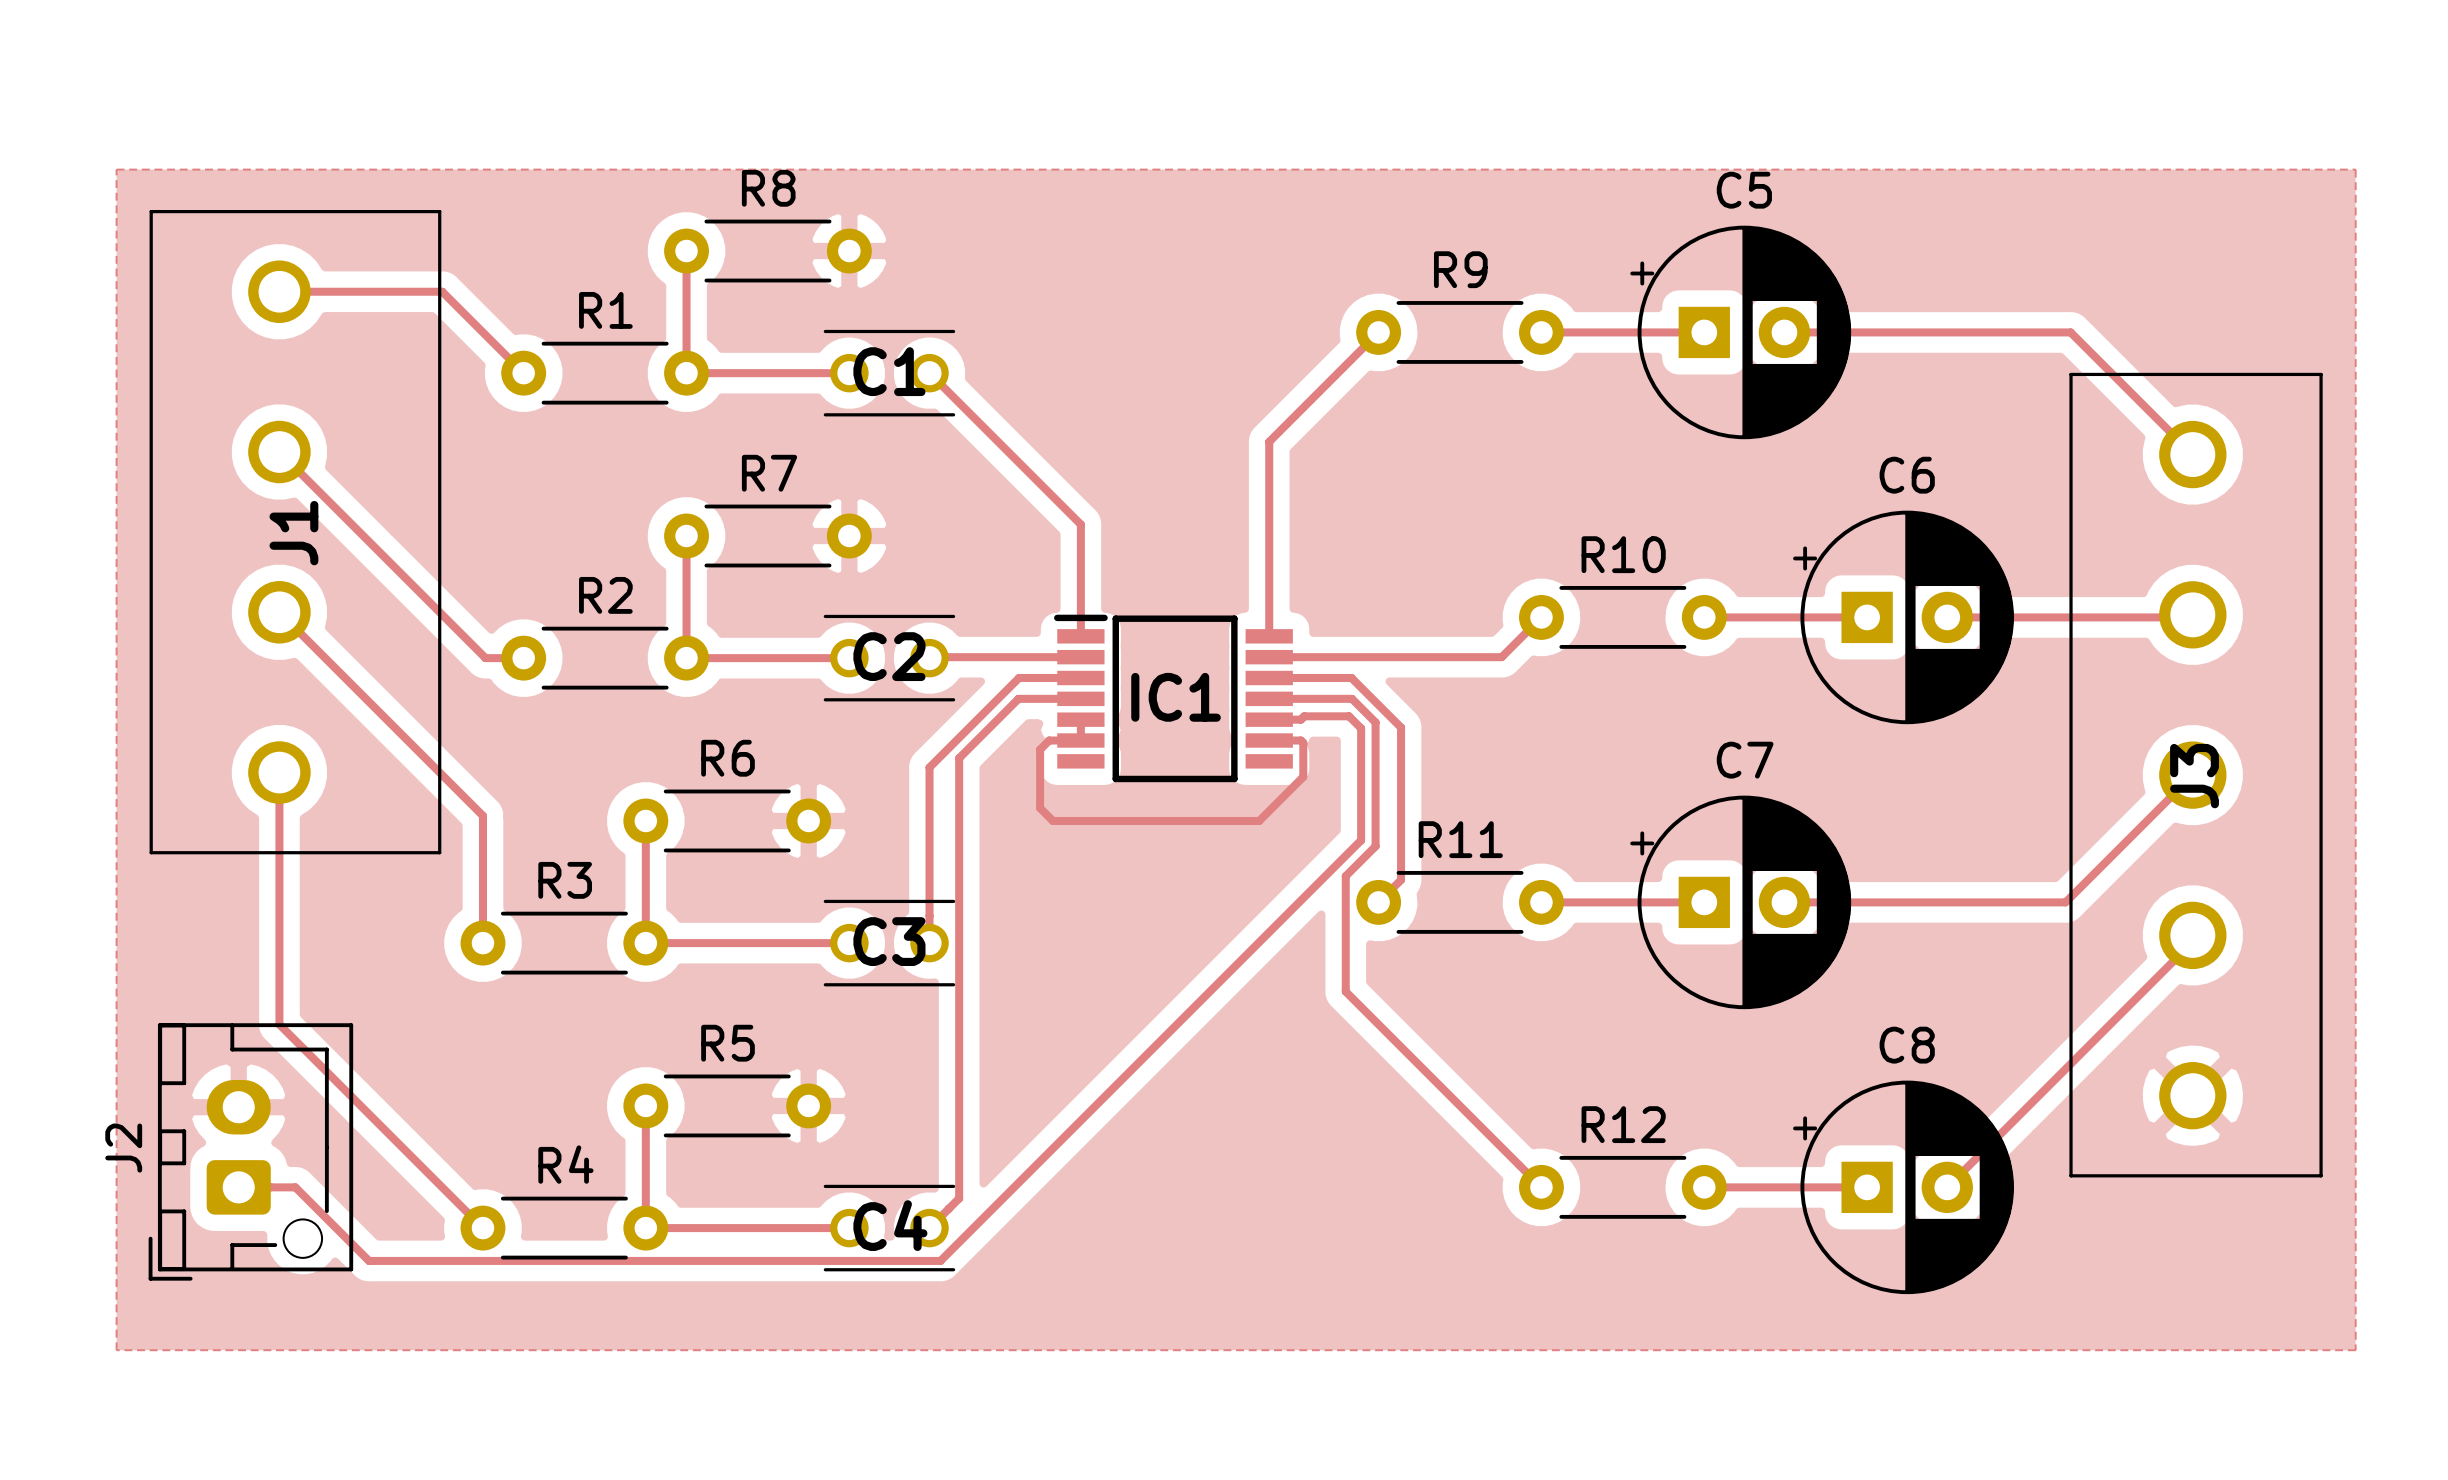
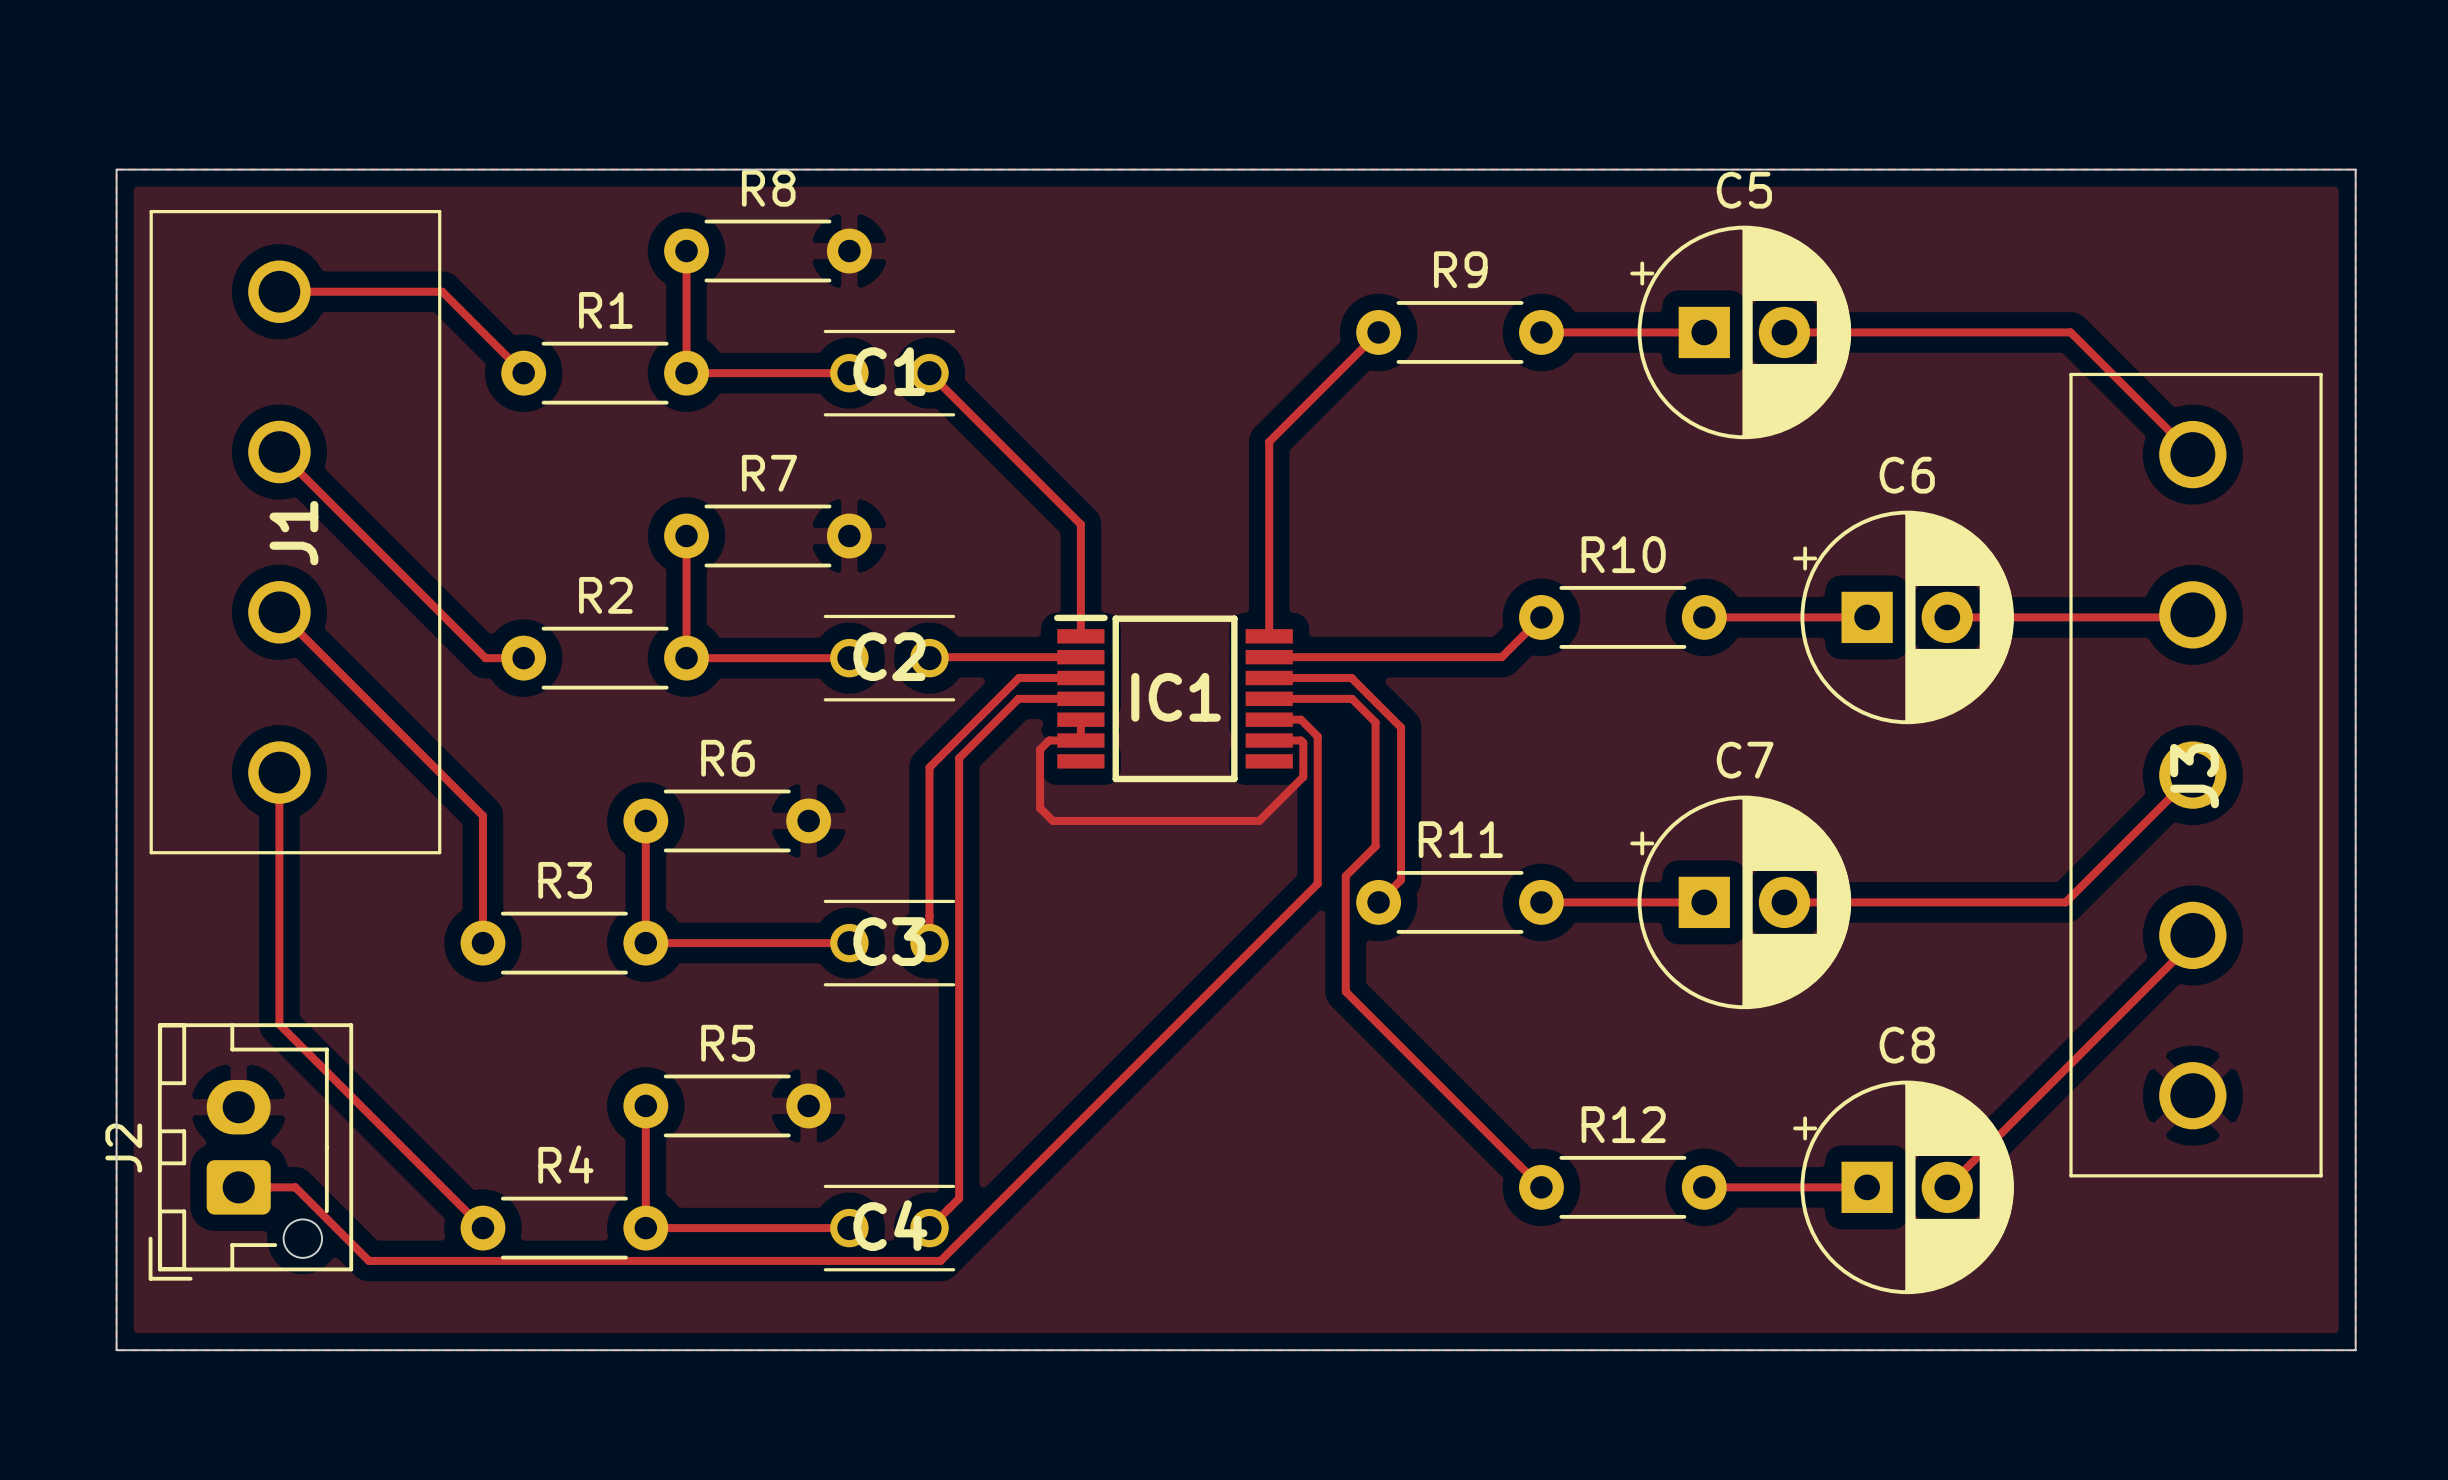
board edge: none -> (116, 169) (2355, 169) (2355, 1350) (116, 1350) (116, 169)
track: (1300, 719) (1304, 716) (1349, 716) (1361, 728) (1361, 840) (1317, 883) -> (1300, 719) (1317, 736) (1317, 883)

